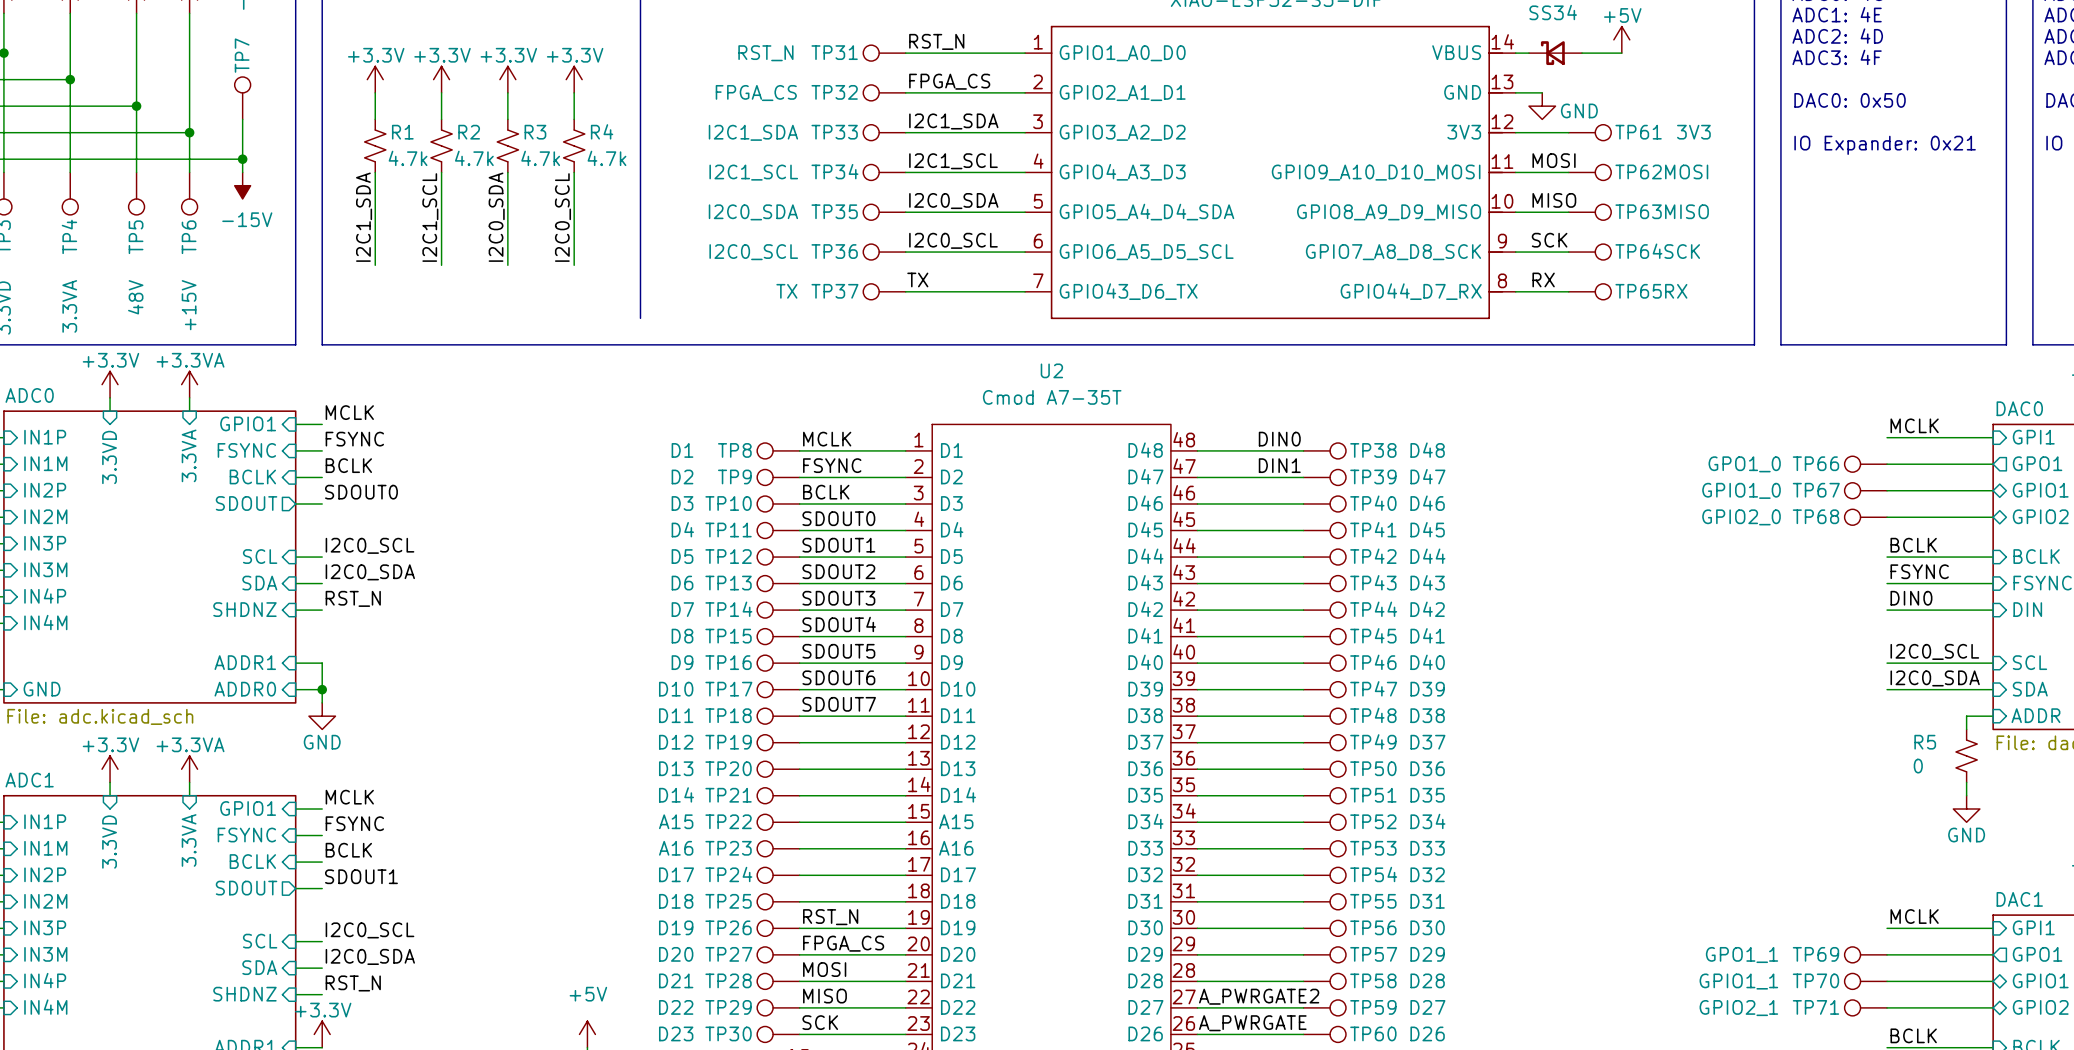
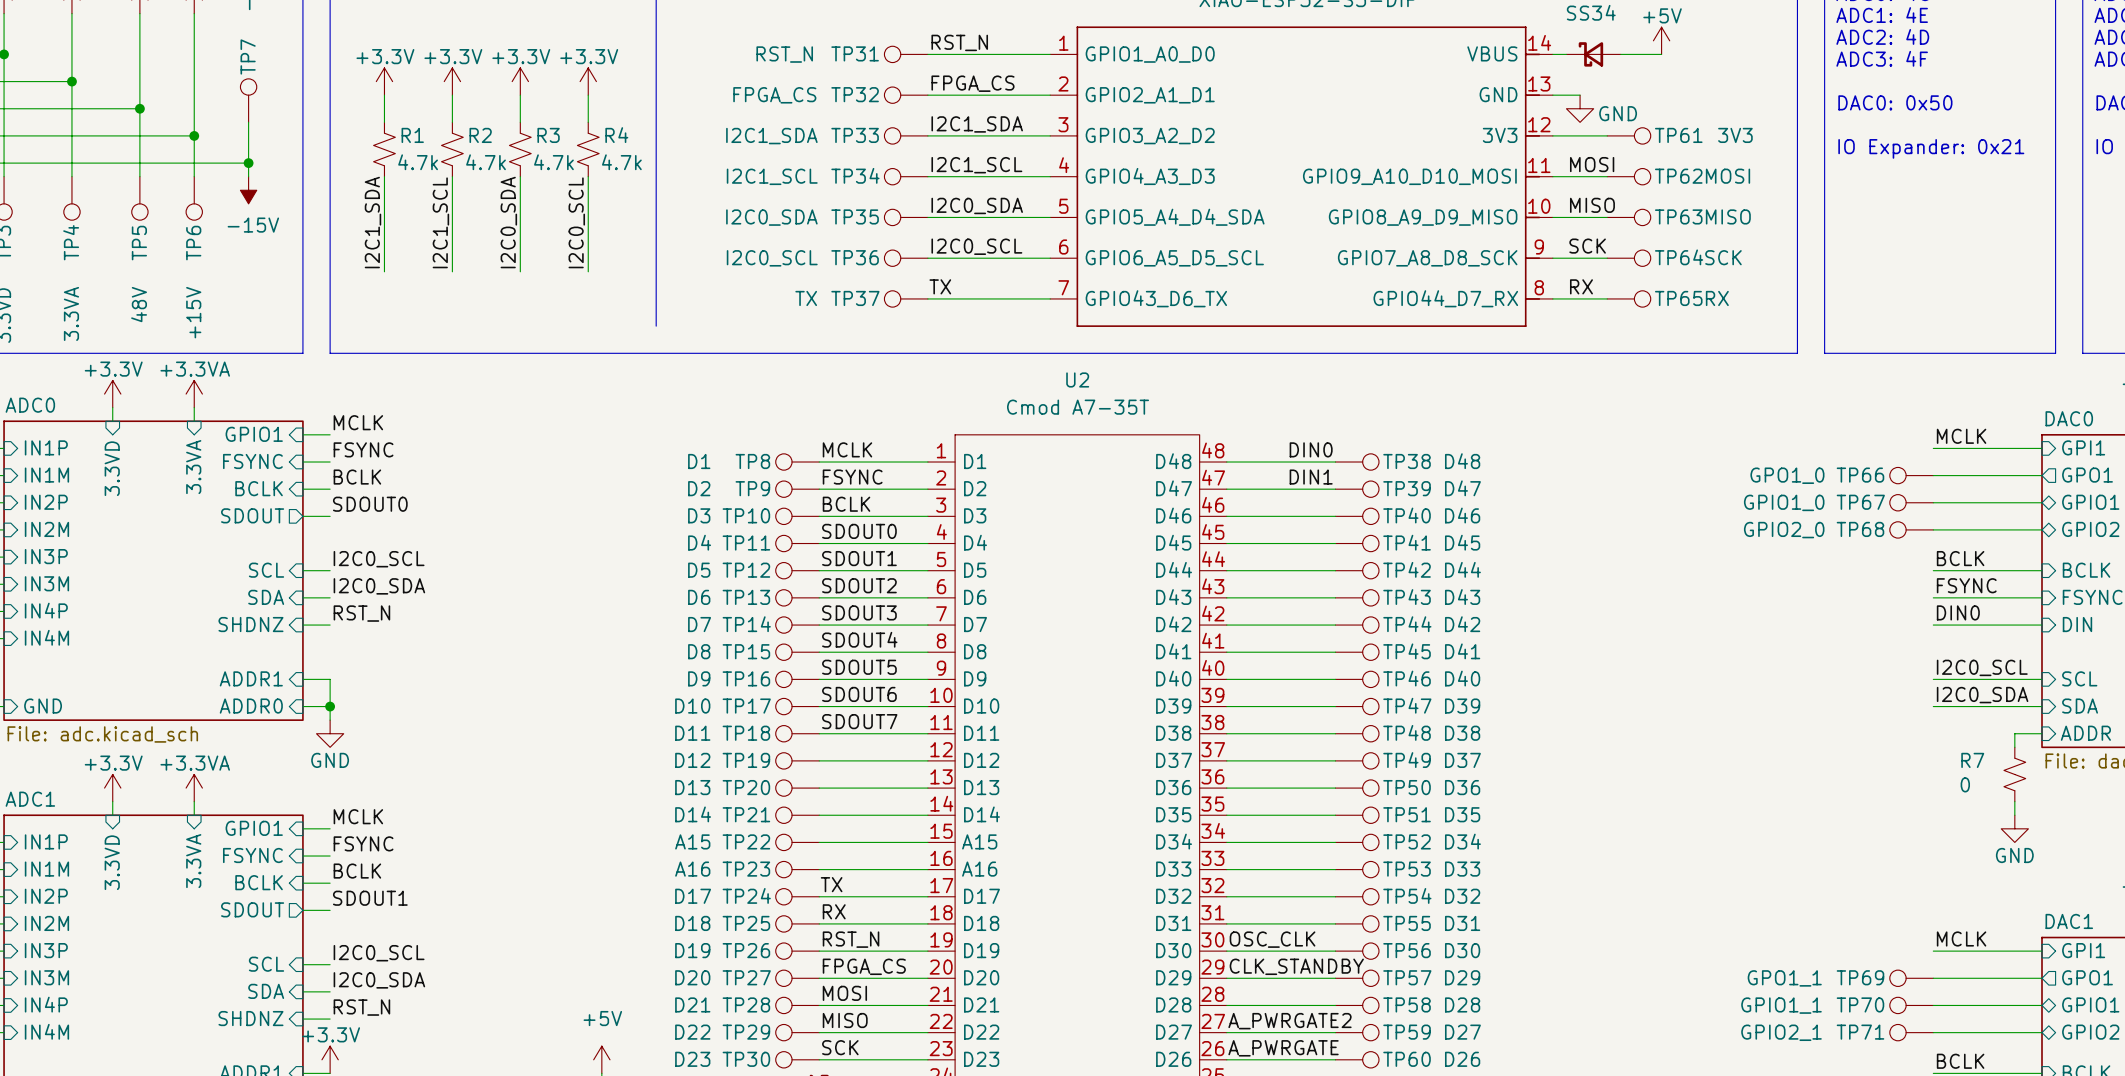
R5 name: R5 (1925, 742) -> R7 (1972, 760)
label: none -> TX (831, 884)
label: none -> RX (834, 911)
label: none -> OSC_CLK (1272, 939)
label: none -> CLK_STANDBY (1296, 966)

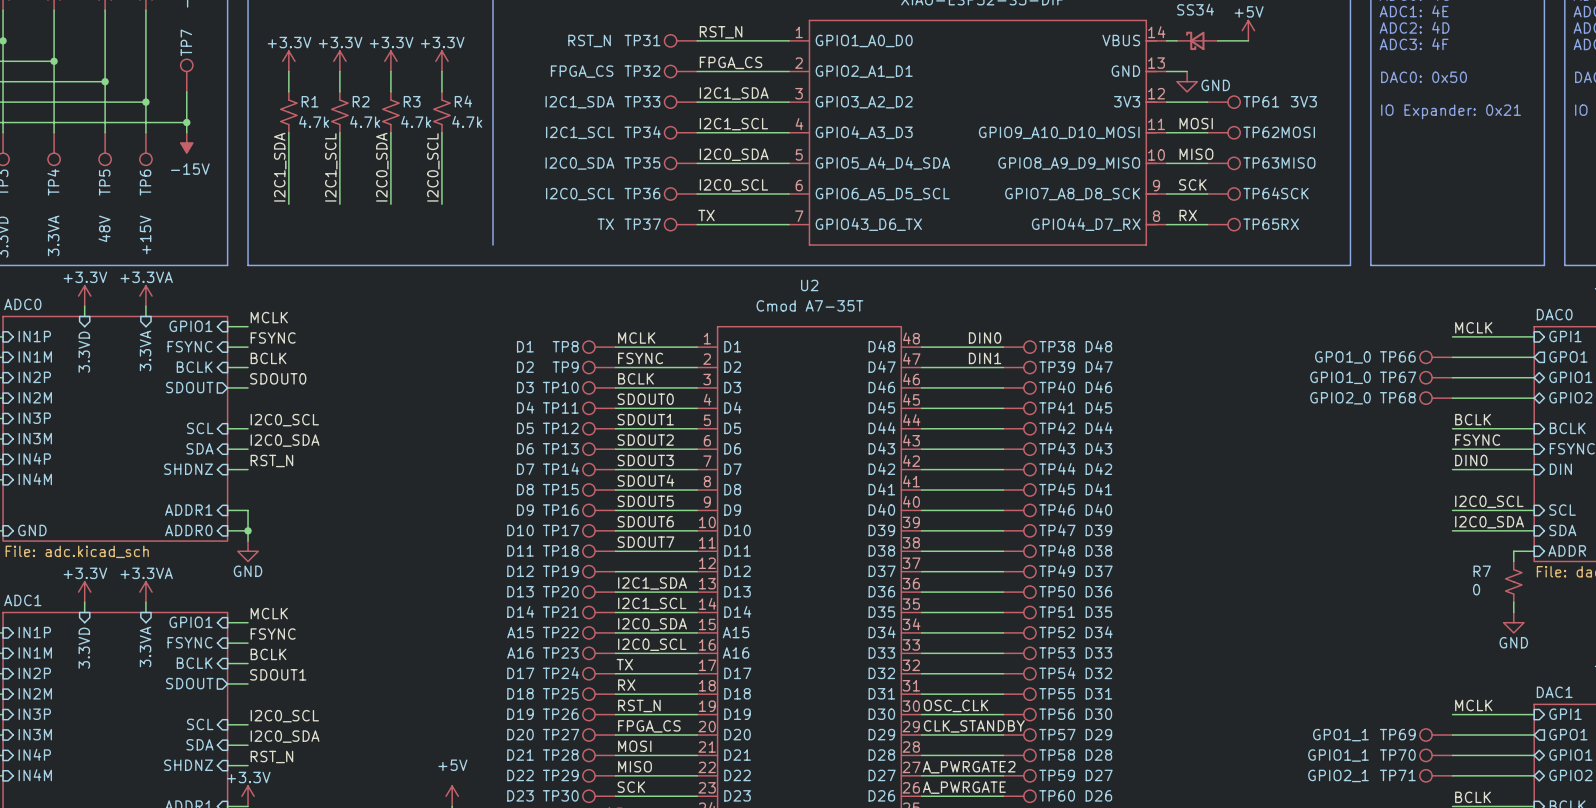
label: none -> I2C1_SDA (652, 583)
label: none -> I2C1_SCL (652, 603)
label: none -> I2C0_SDA (652, 624)
label: none -> I2C0_SCL (652, 644)

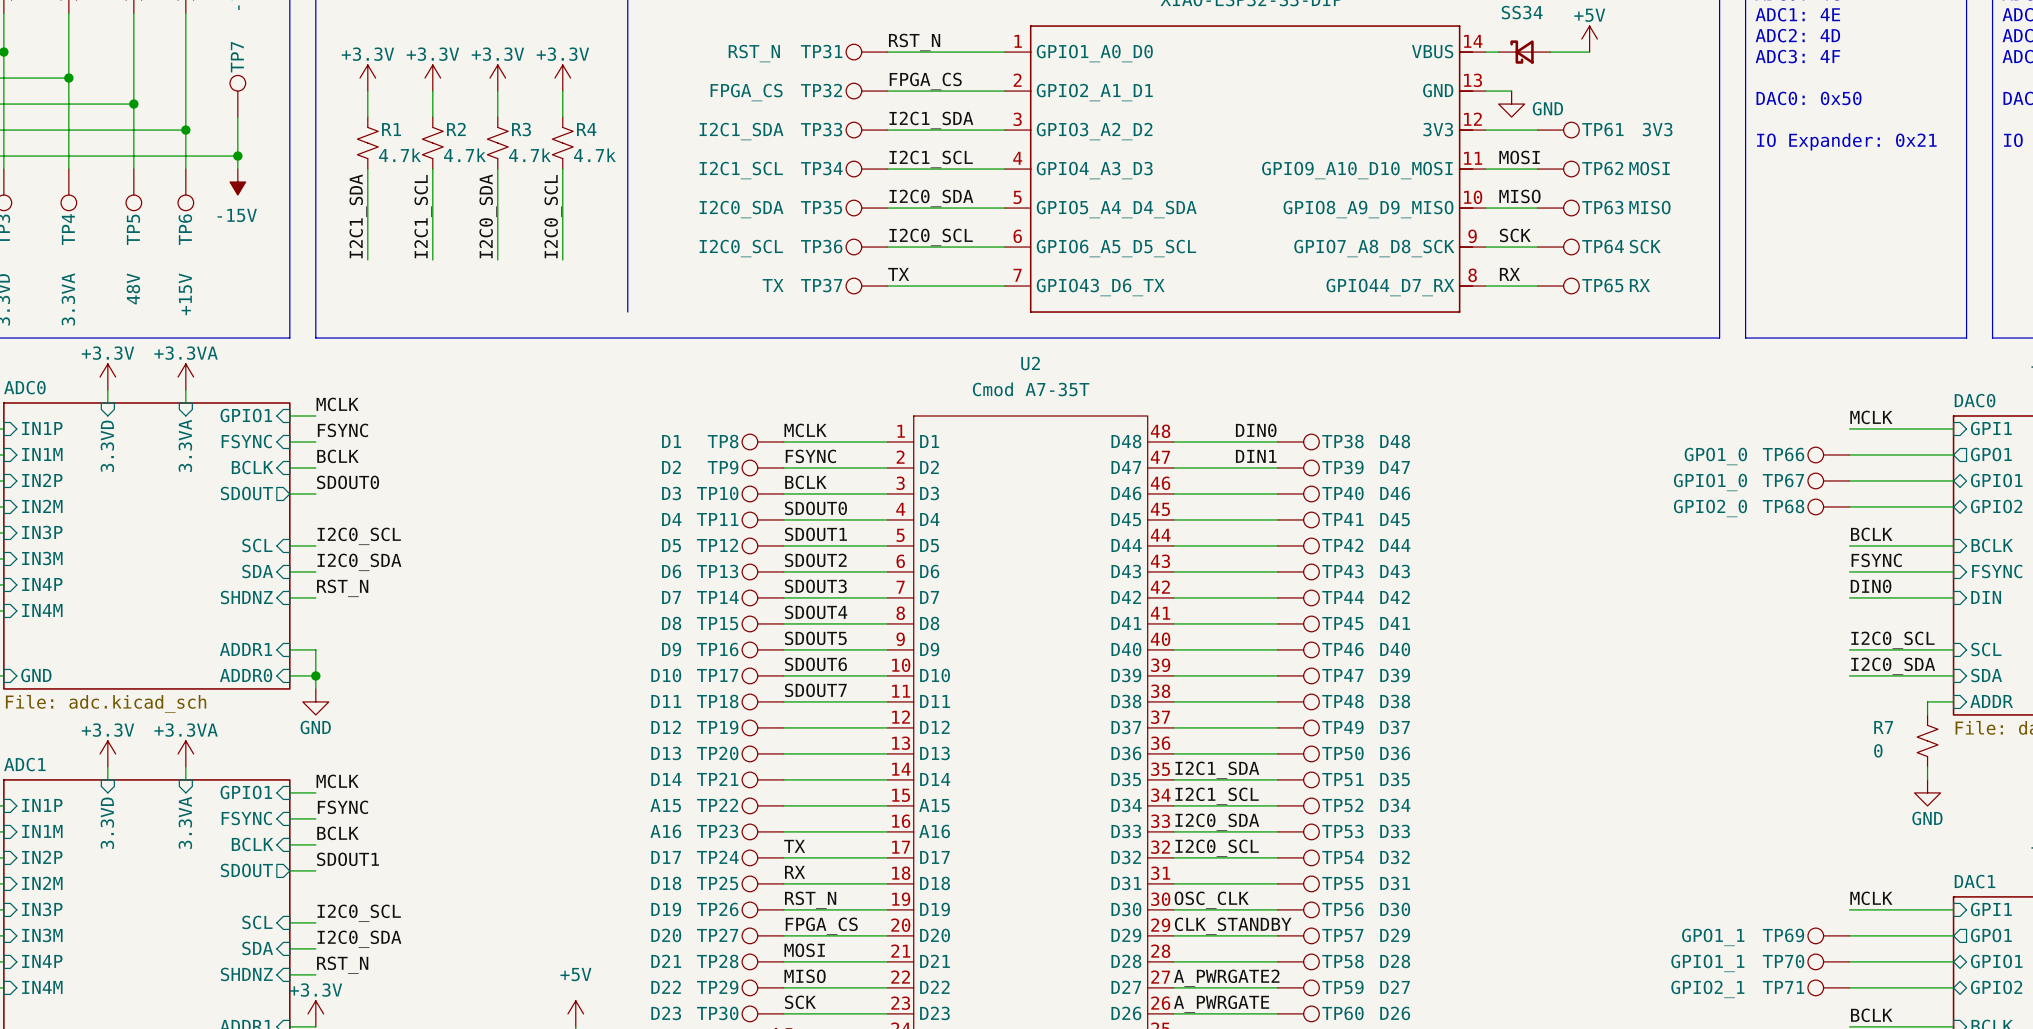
label: I2C1_SDA (652, 583) -> none
label: I2C1_SCL (652, 603) -> none
label: none -> I2C1_SDA (1217, 770)
label: I2C0_SDA (652, 624) -> none
label: none -> I2C1_SCL (1217, 796)
label: I2C0_SCL (652, 644) -> none
label: none -> I2C0_SDA (1217, 822)
label: none -> I2C0_SCL (1217, 848)

